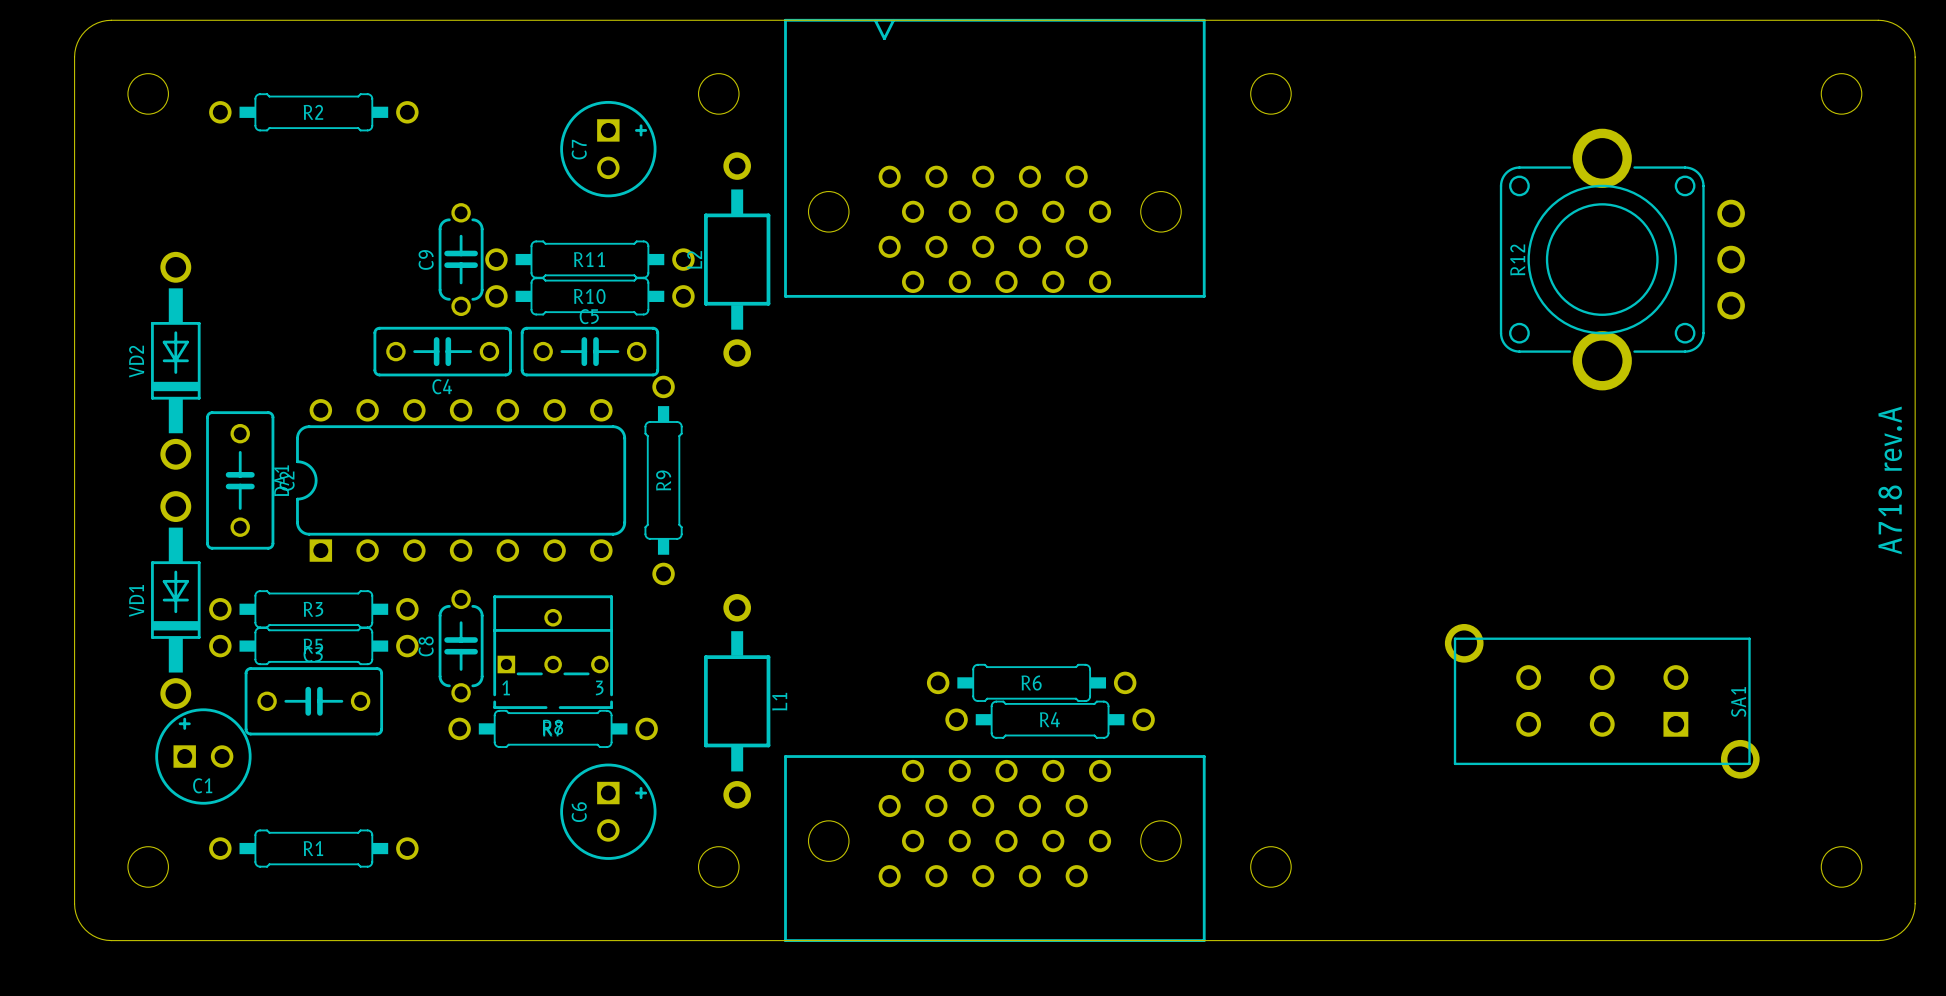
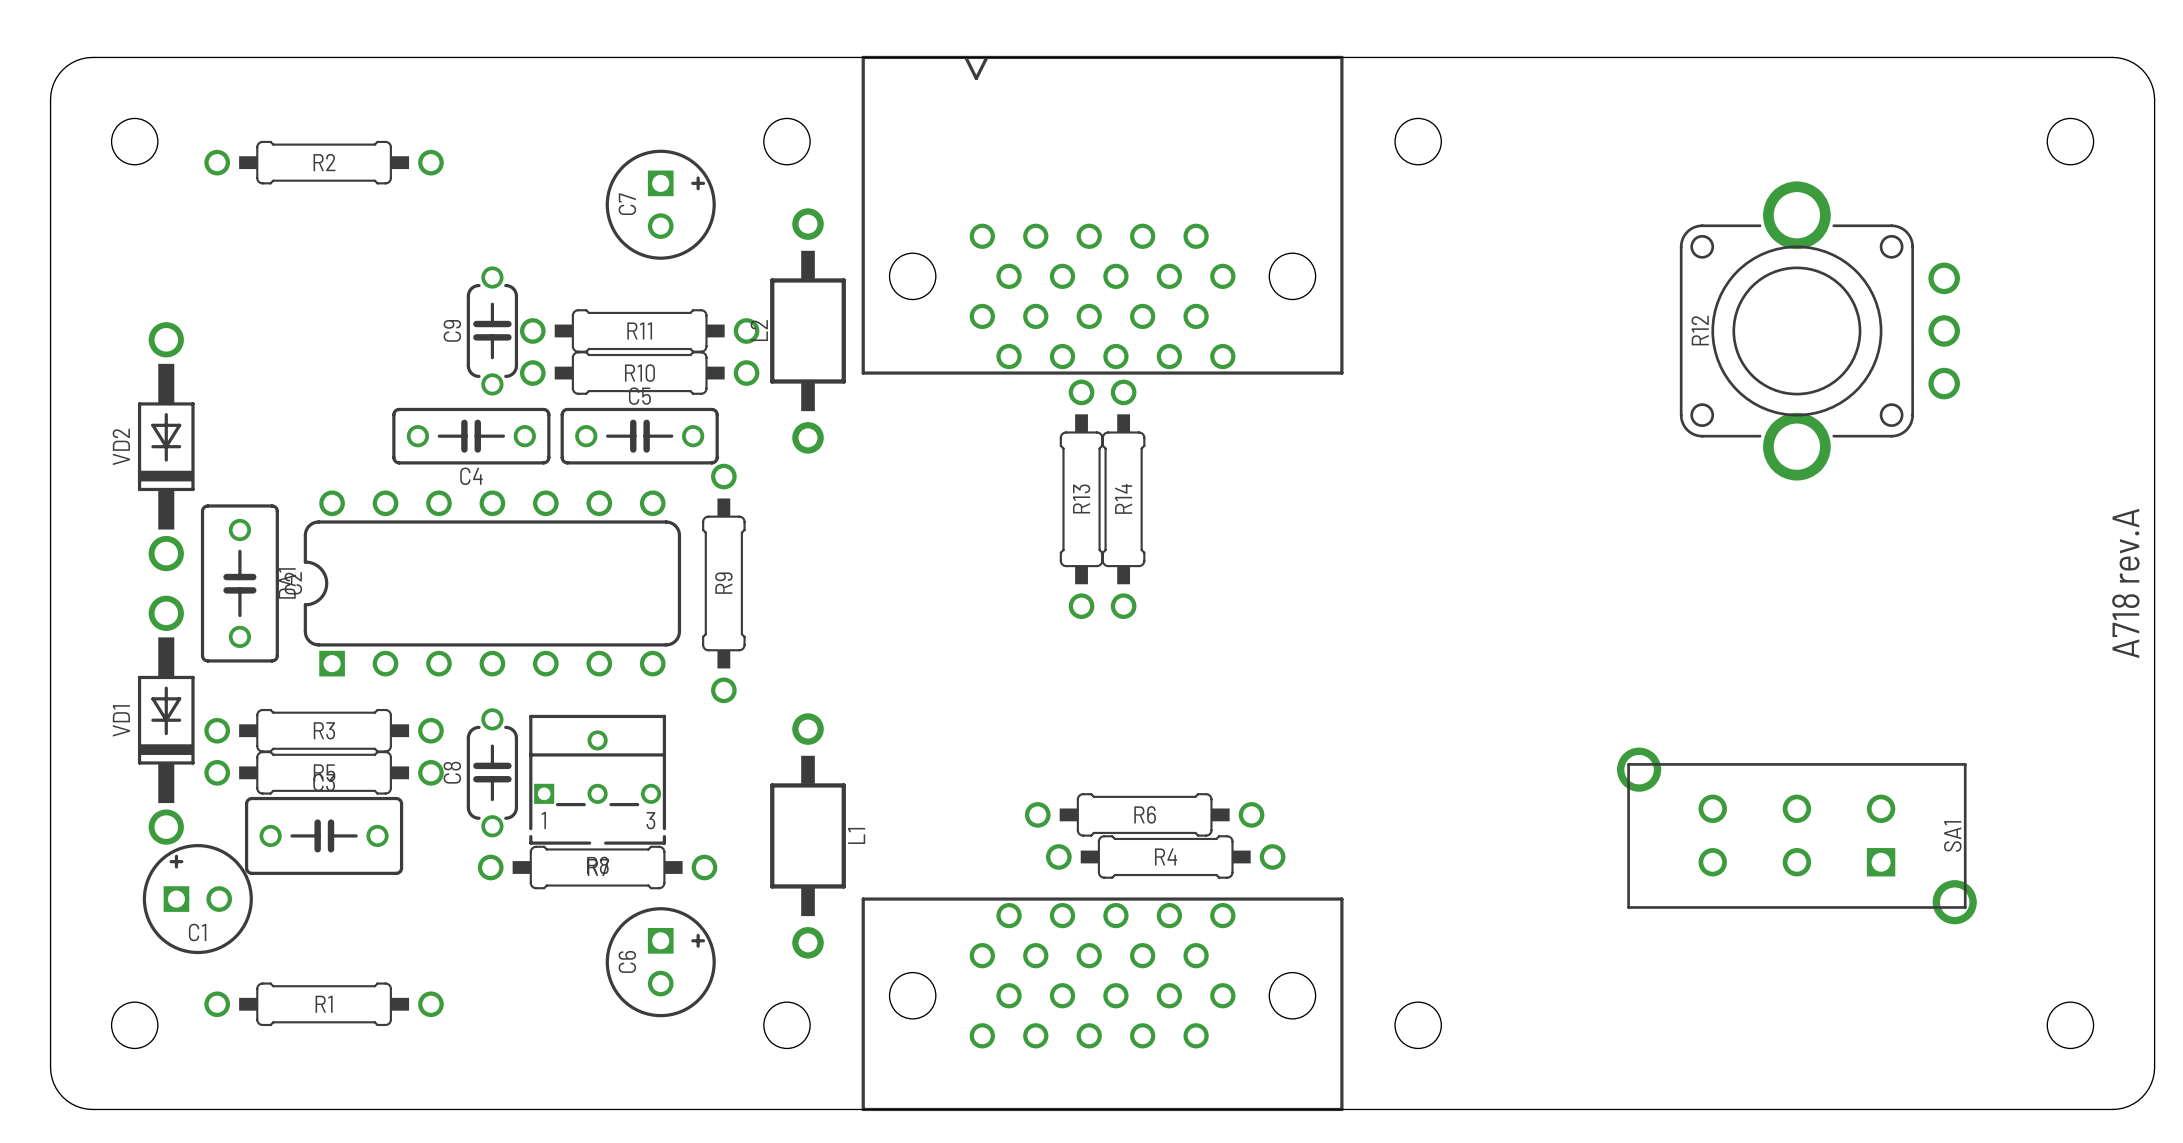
R13: none -> (1081, 499)
R14: none -> (1123, 499)

